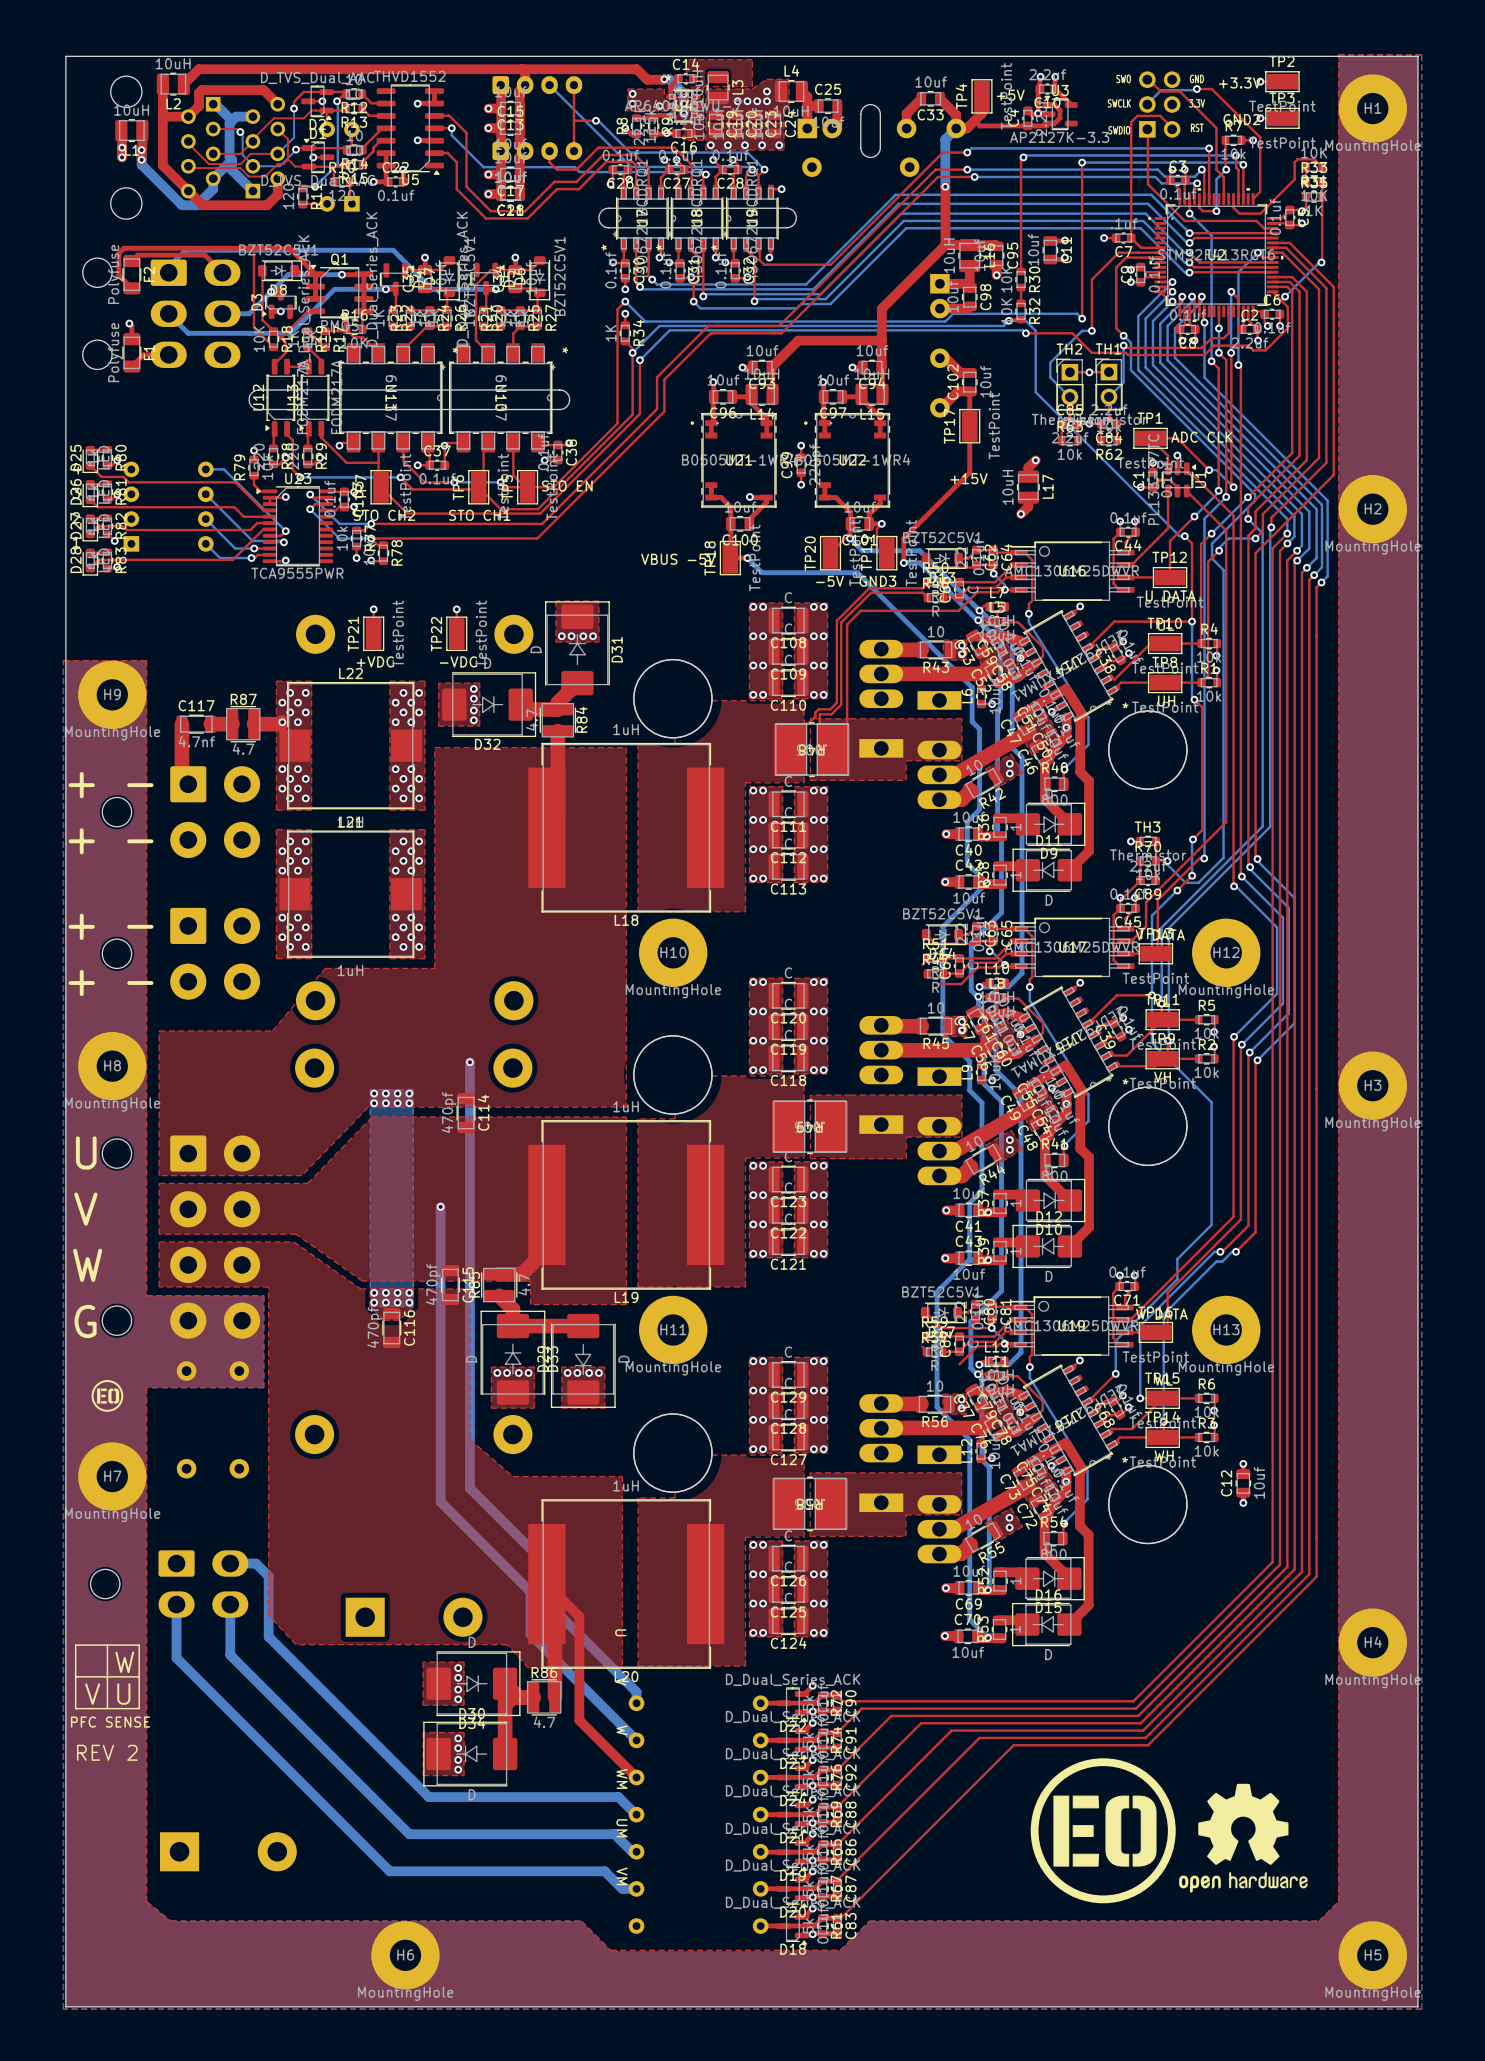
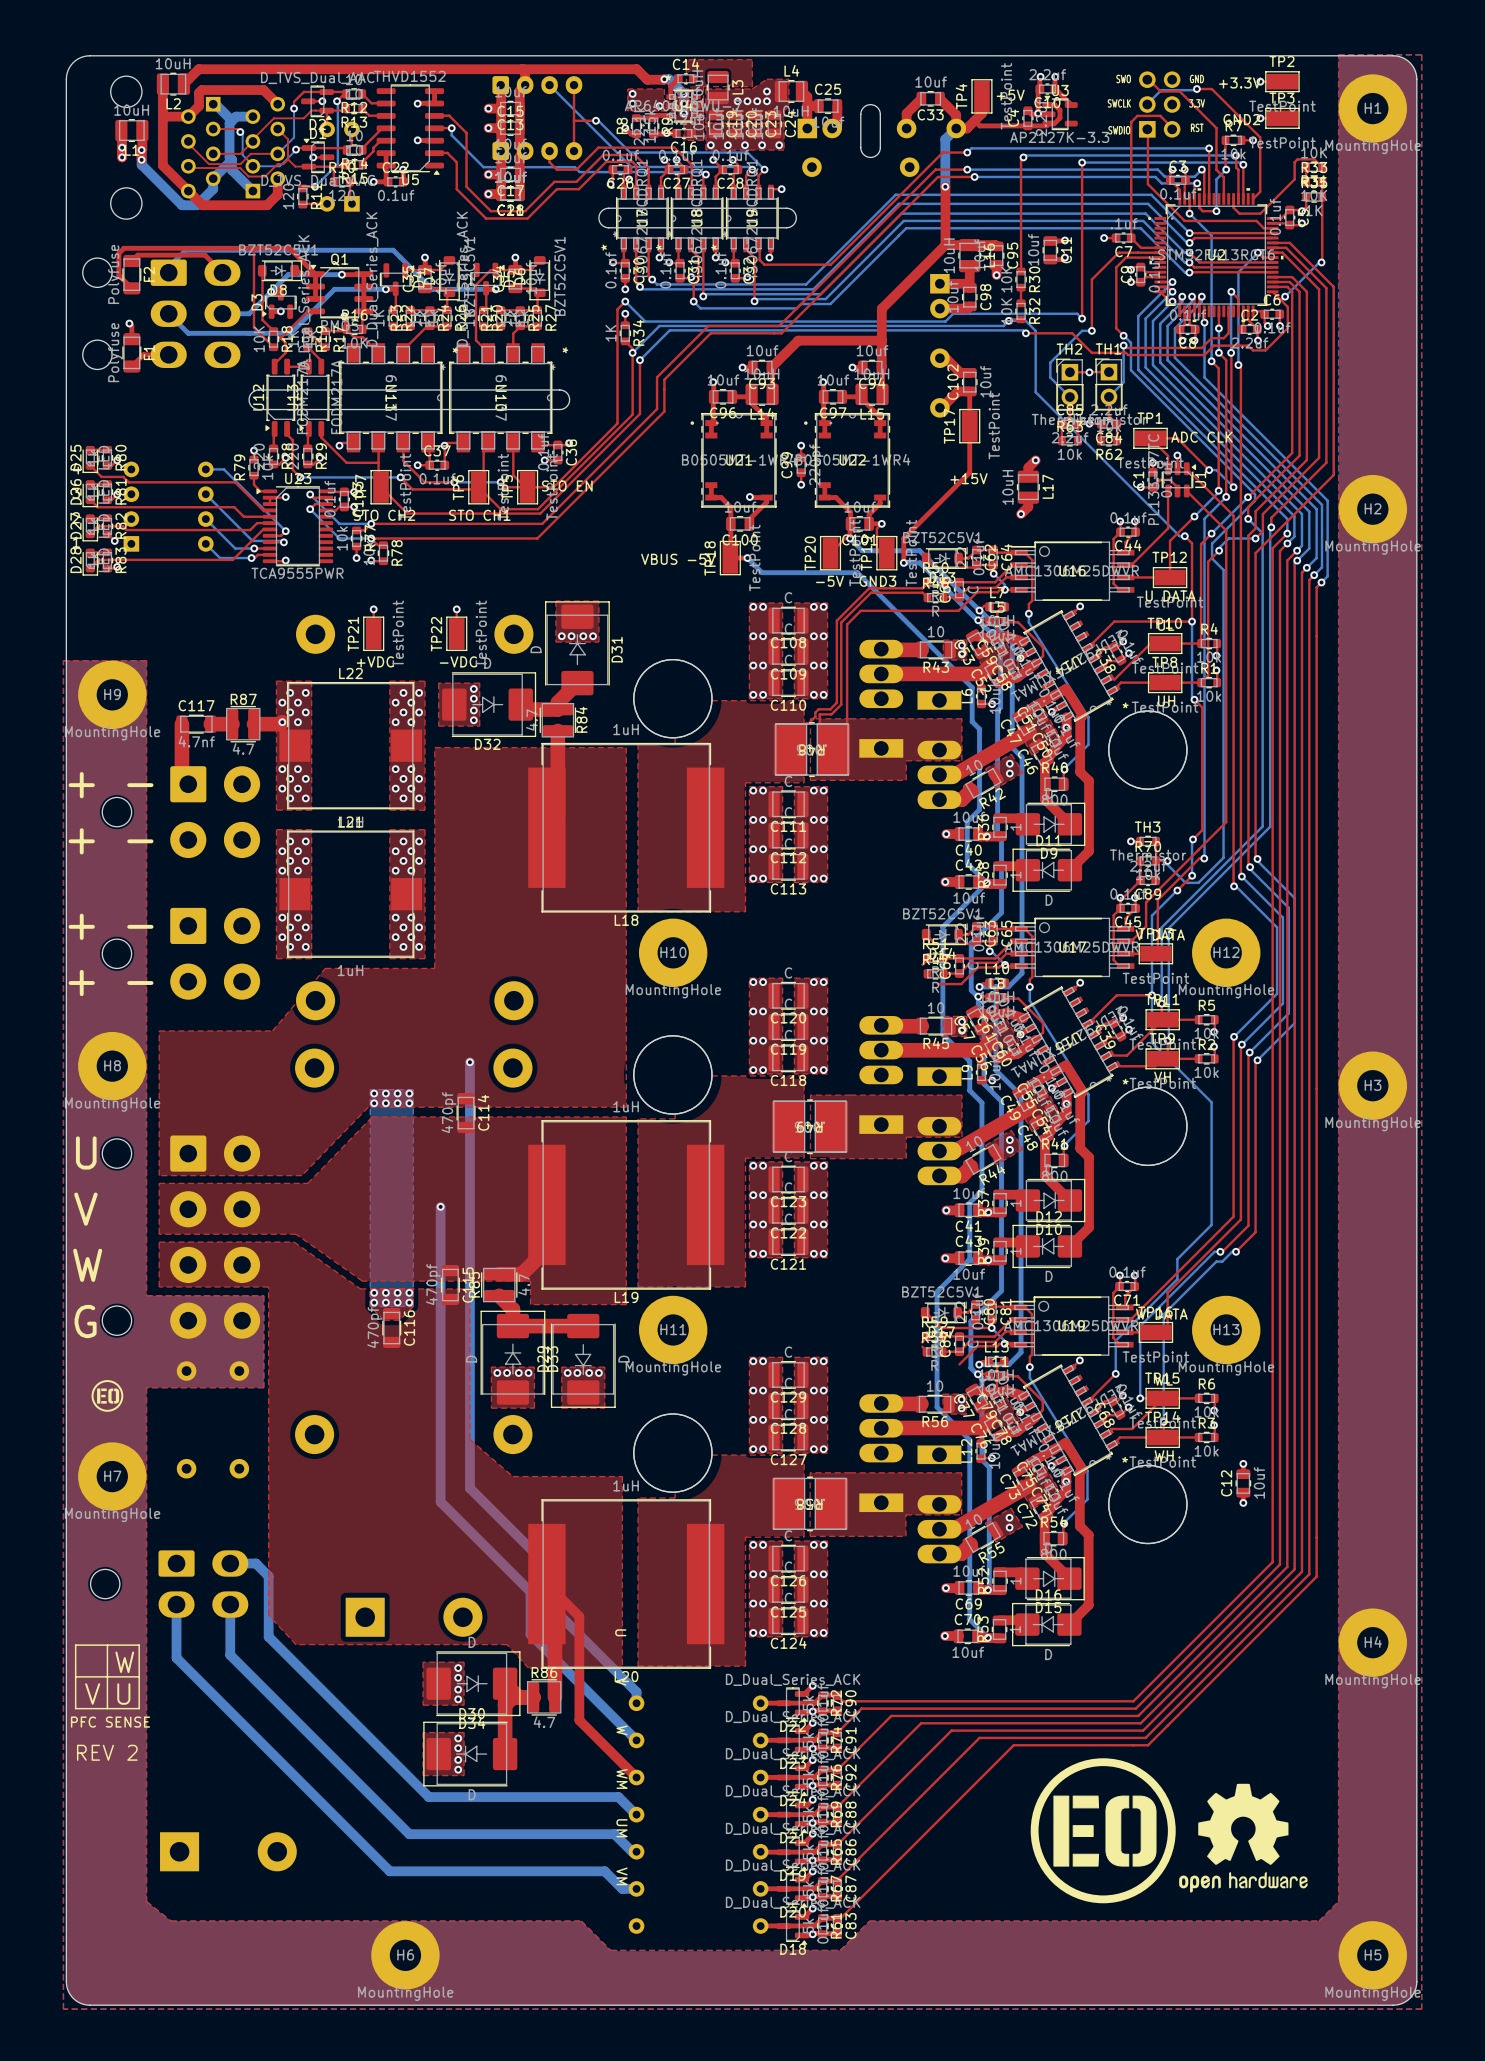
board edge: (65, 56) (1417, 56) (1417, 2006) (65, 2006) (65, 56) -> (89, 55) (80, 57) (73, 62) (68, 70) (66, 79) (66, 1981) (71, 1996) (78, 2002) (89, 2005) (1393, 2005) (1407, 2000) (1413, 1993) (1416, 1981) (1416, 79) (1411, 64) (1402, 57) (1393, 55) (89, 55)

